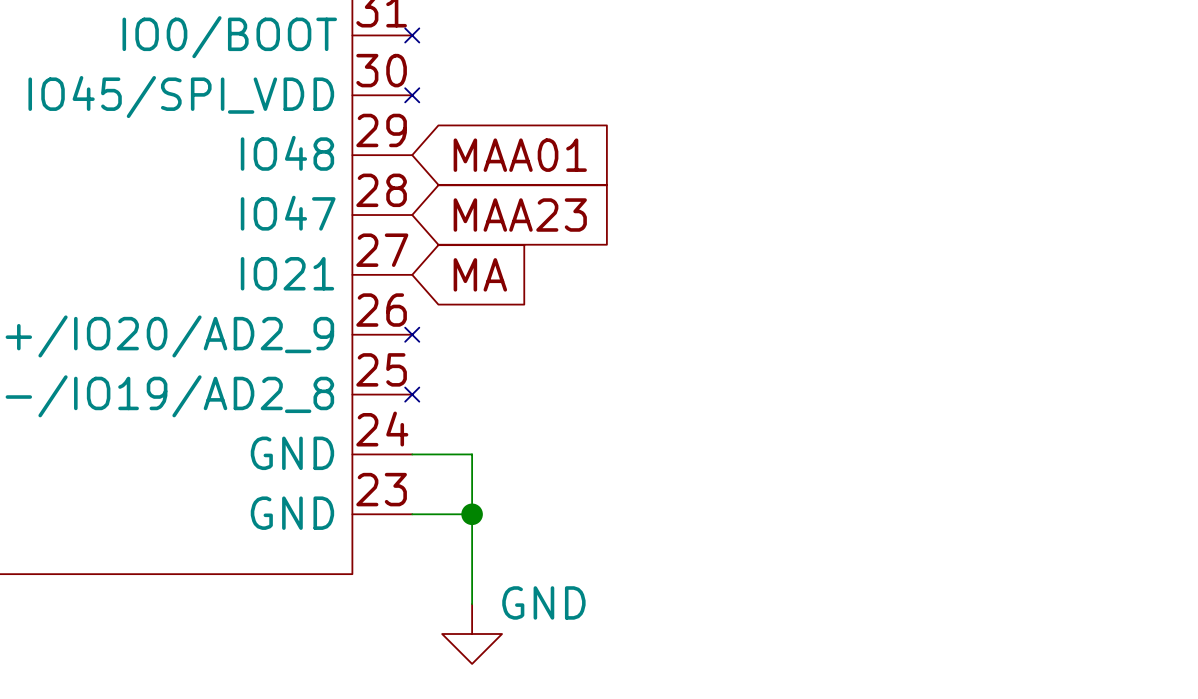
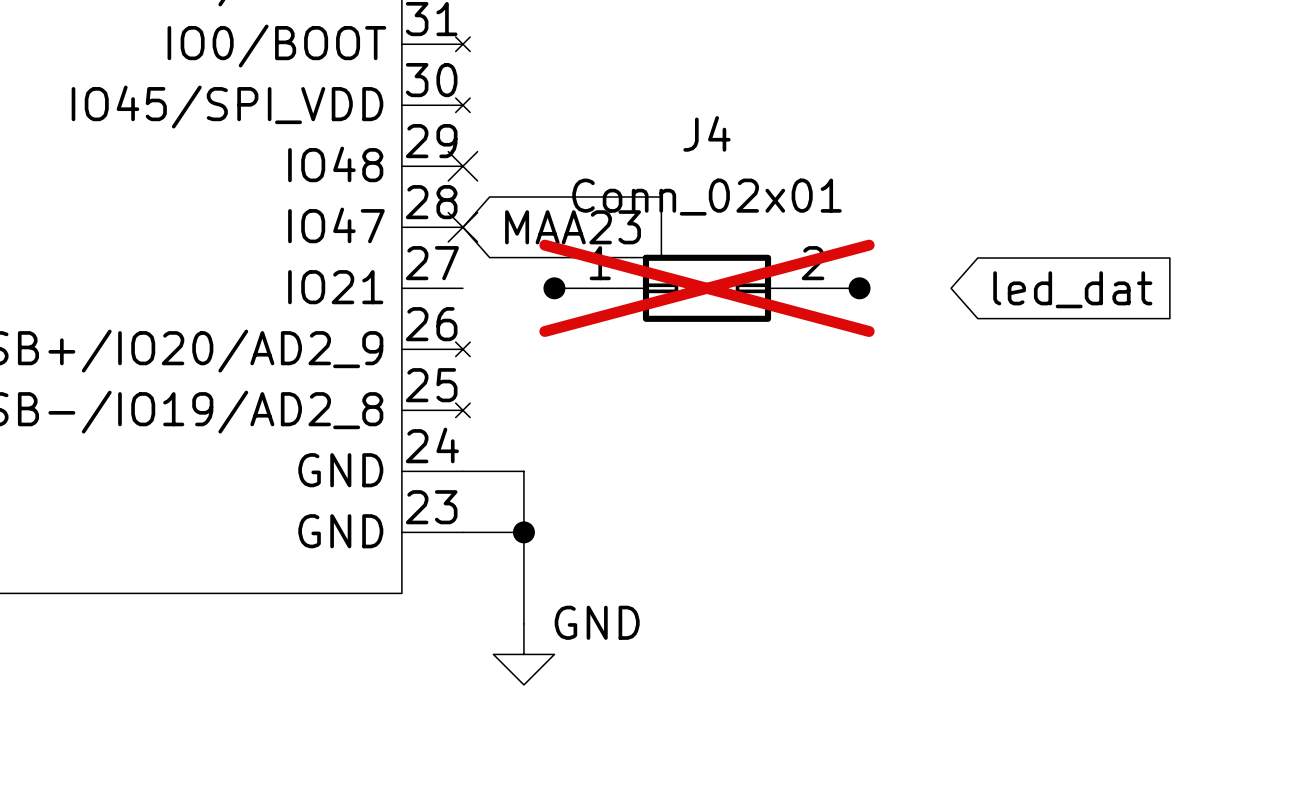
no-connect mark: none -> (462, 166)
global label: MAA01 (520, 155) -> none
no-connect mark: none -> (462, 227)
global label: MA (480, 274) -> none
junction: none -> (554, 288)
J4: none -> Conn_02x01 (707, 288)
junction: none -> (859, 288)
global label: none -> led_dat (1072, 289)

